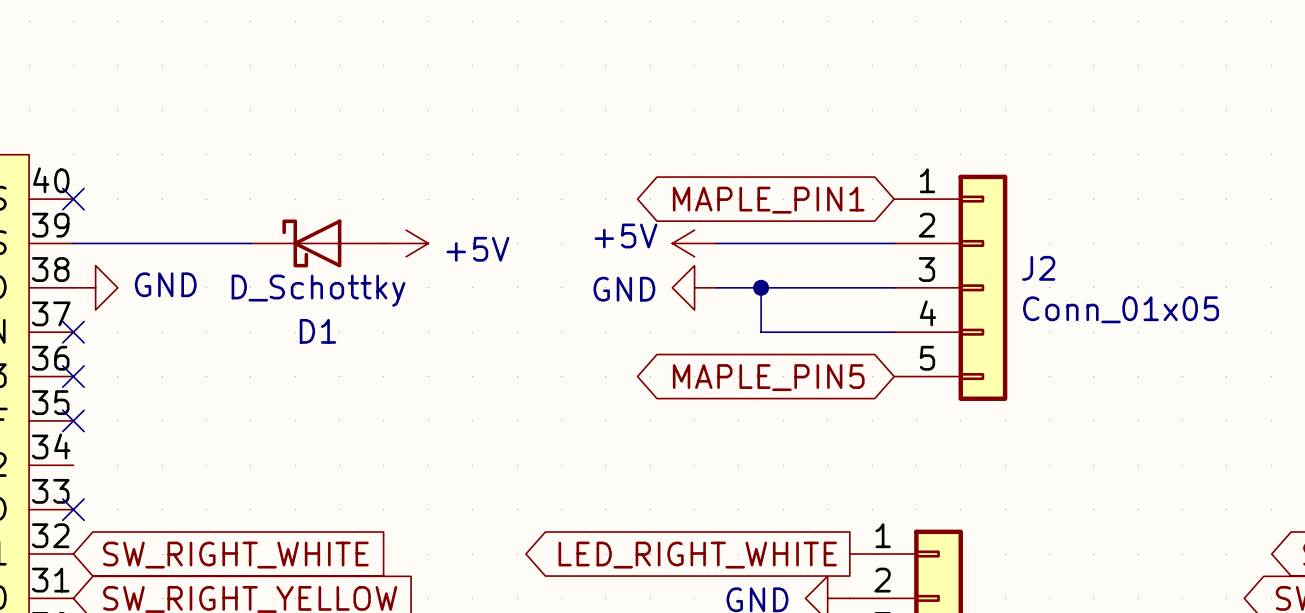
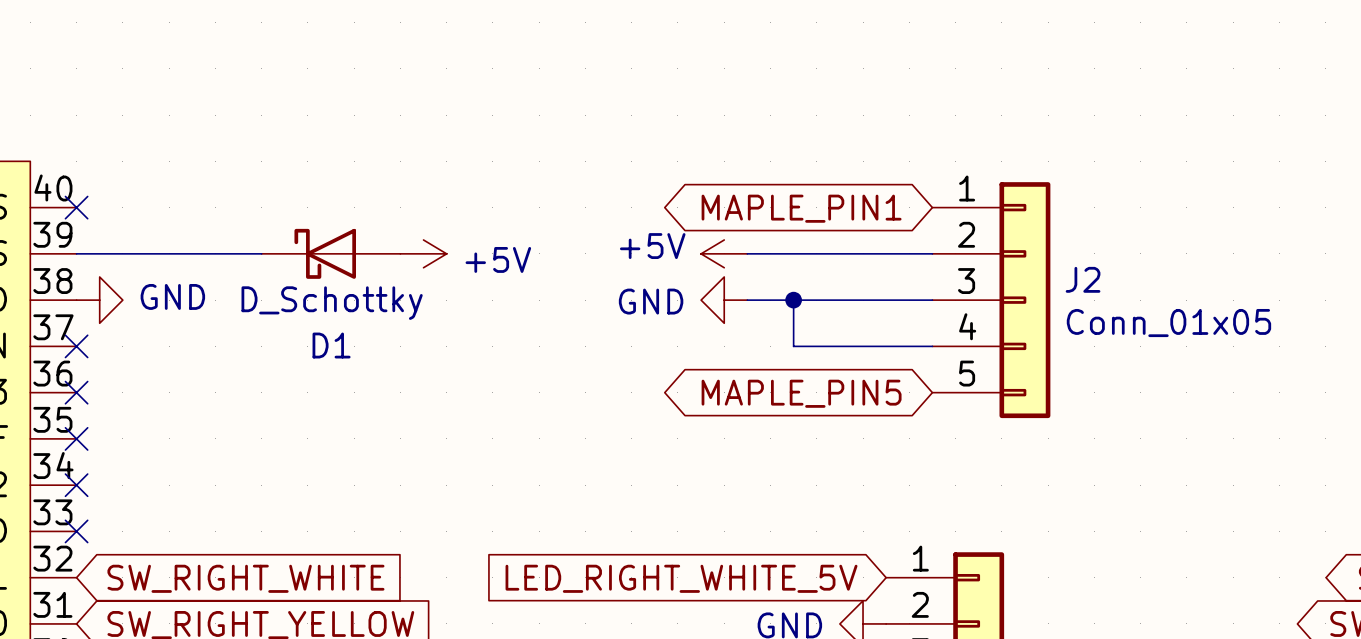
no-connect mark: none -> (76, 485)
global label shape: output (697, 555) -> input (681, 578)
global label: LED_RIGHT_WHITE (697, 555) -> LED_RIGHT_WHITE_5V (681, 578)

